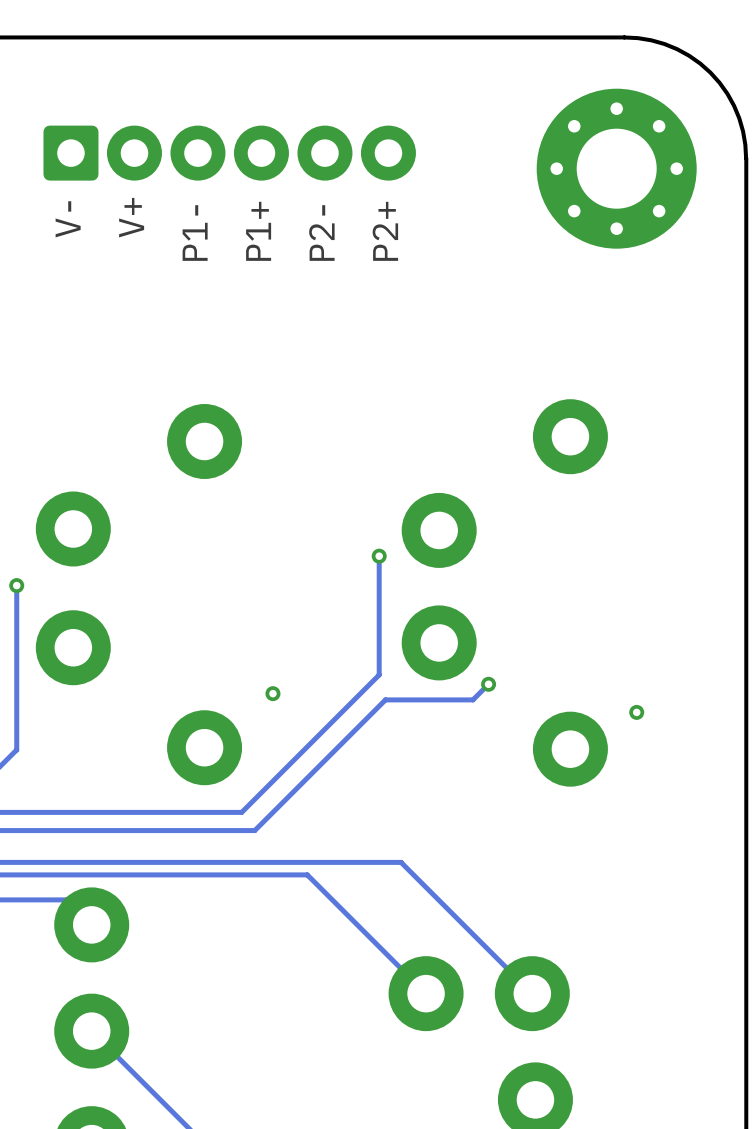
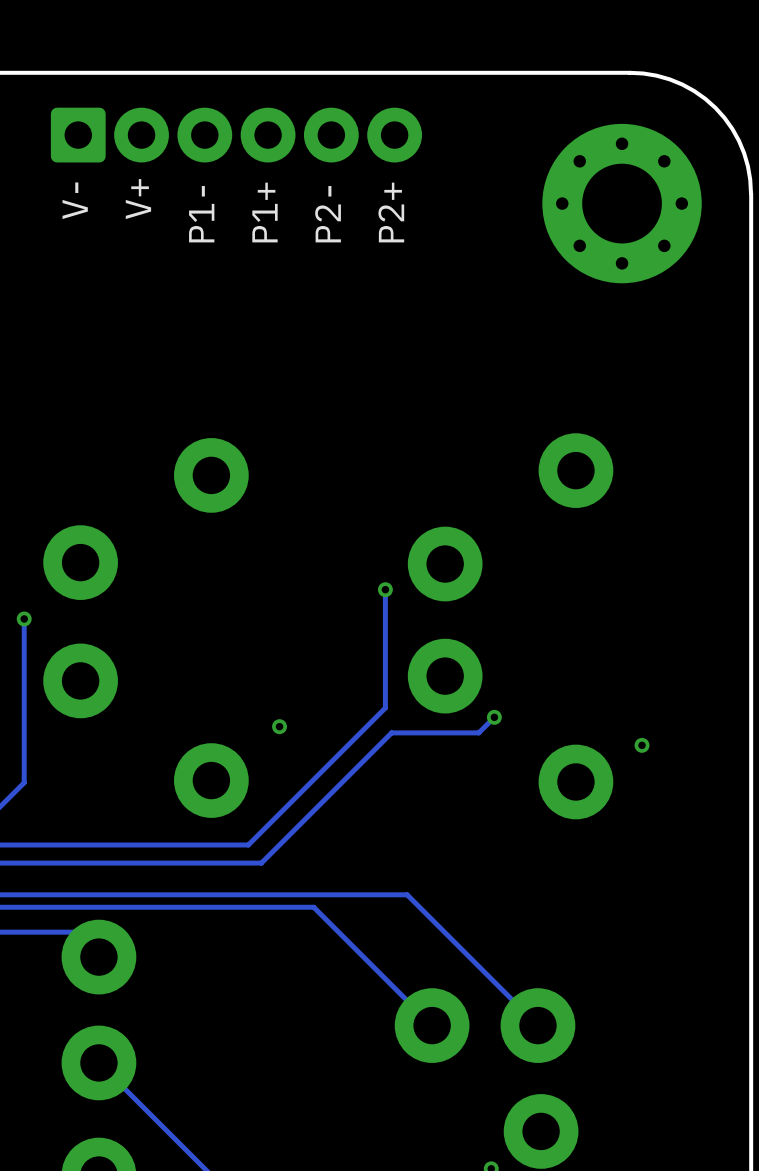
part position: (229, 153) -> (236, 135)
text position: V+ (131, 217) -> V+ (138, 199)
text position: V- (68, 219) -> V- (75, 200)
text position: P1+ (258, 231) -> P1+ (264, 212)
text position: P2+ (385, 231) -> P2+ (391, 212)
text position: P1- (195, 233) -> P1- (201, 214)
text position: P2- (321, 233) -> P2- (328, 214)

